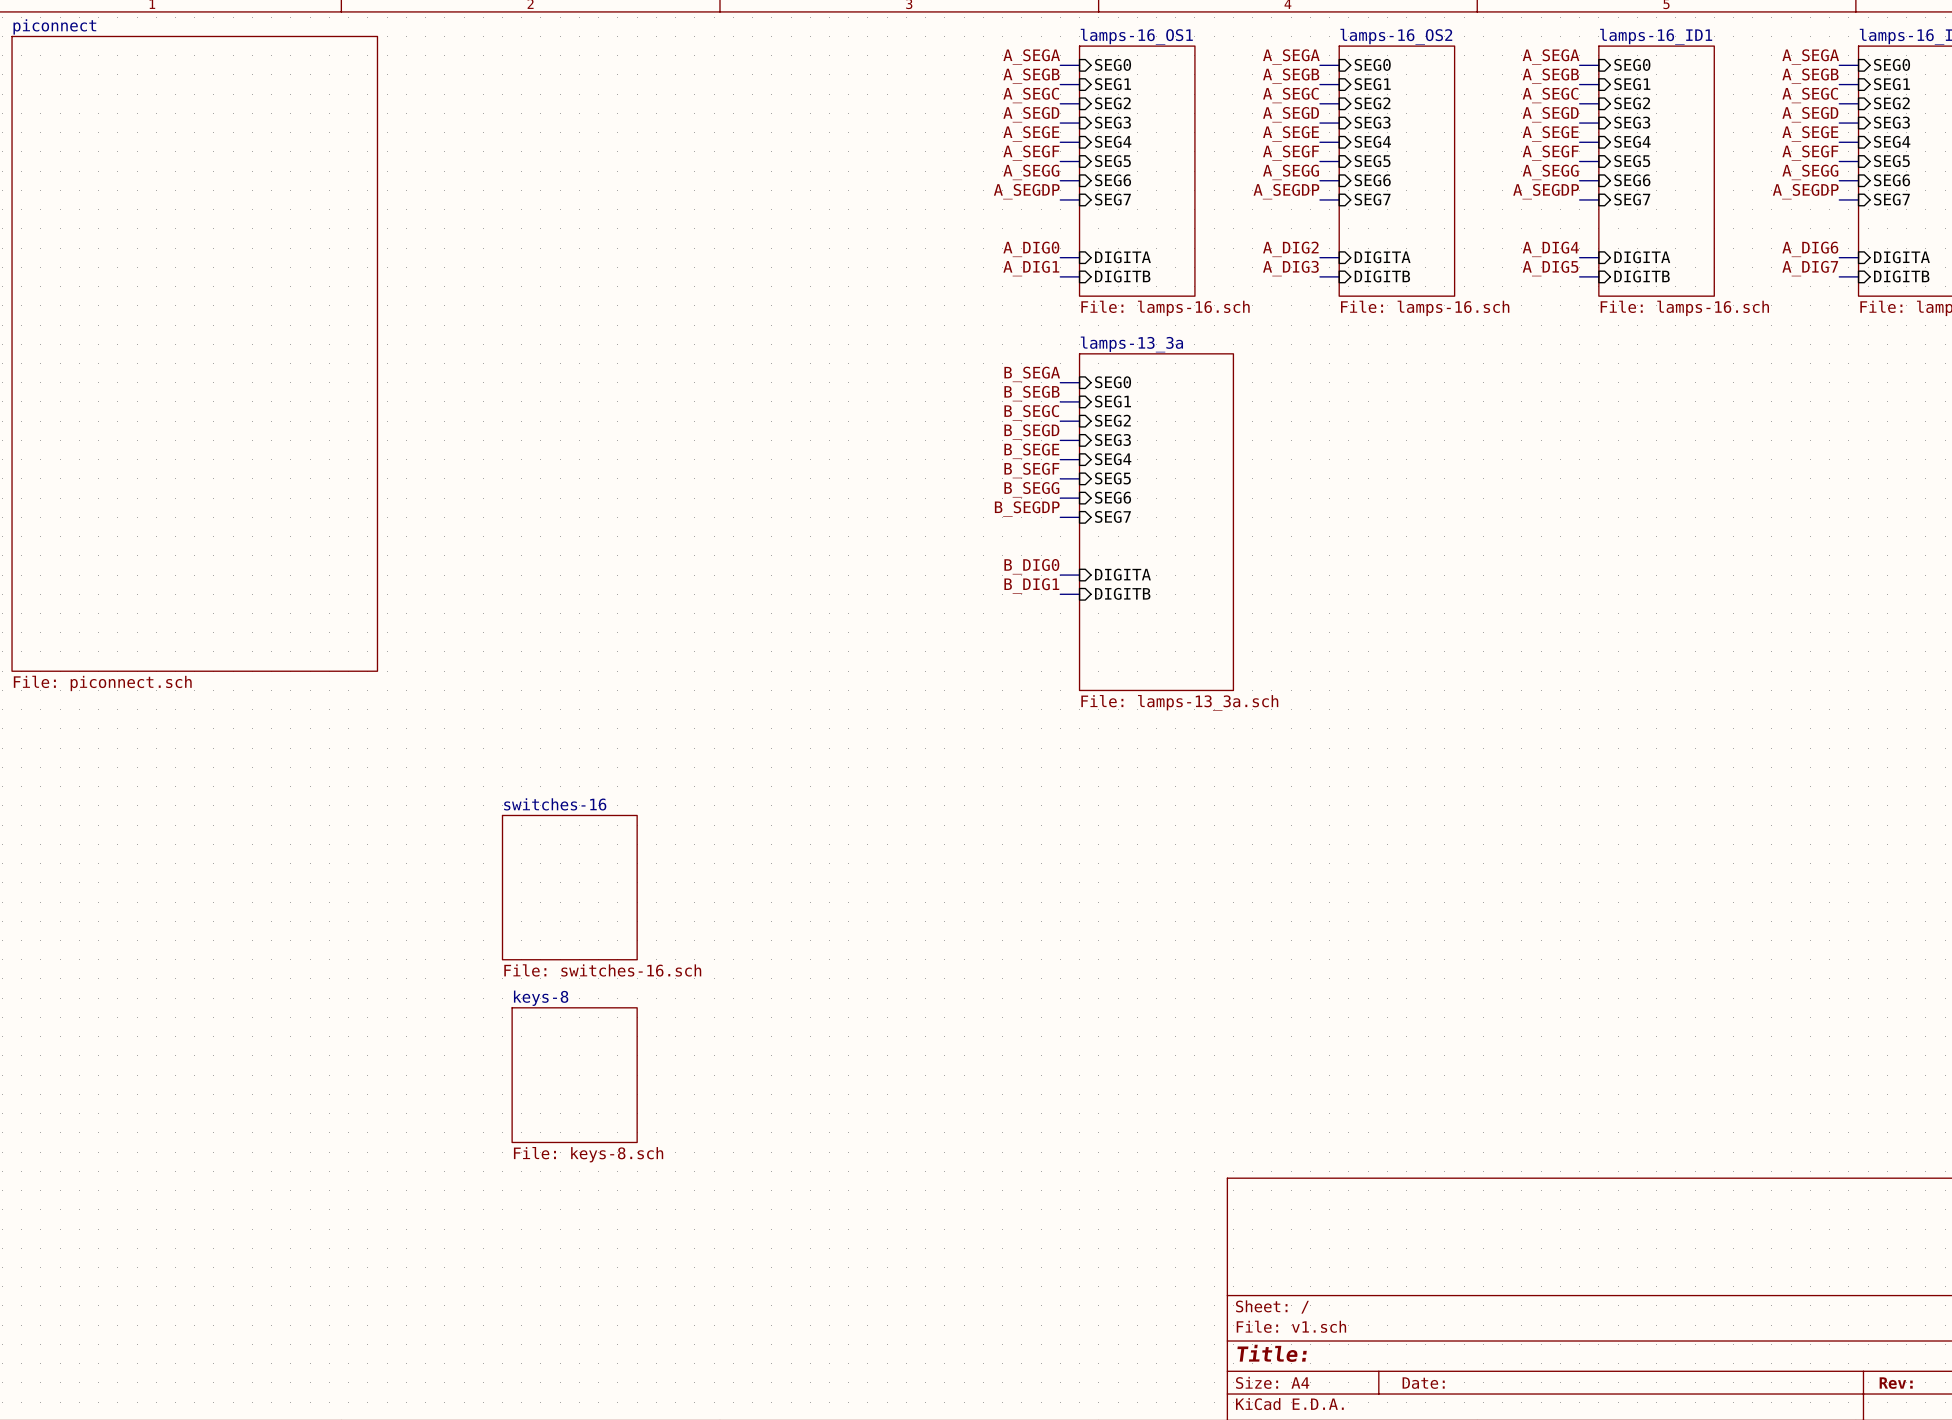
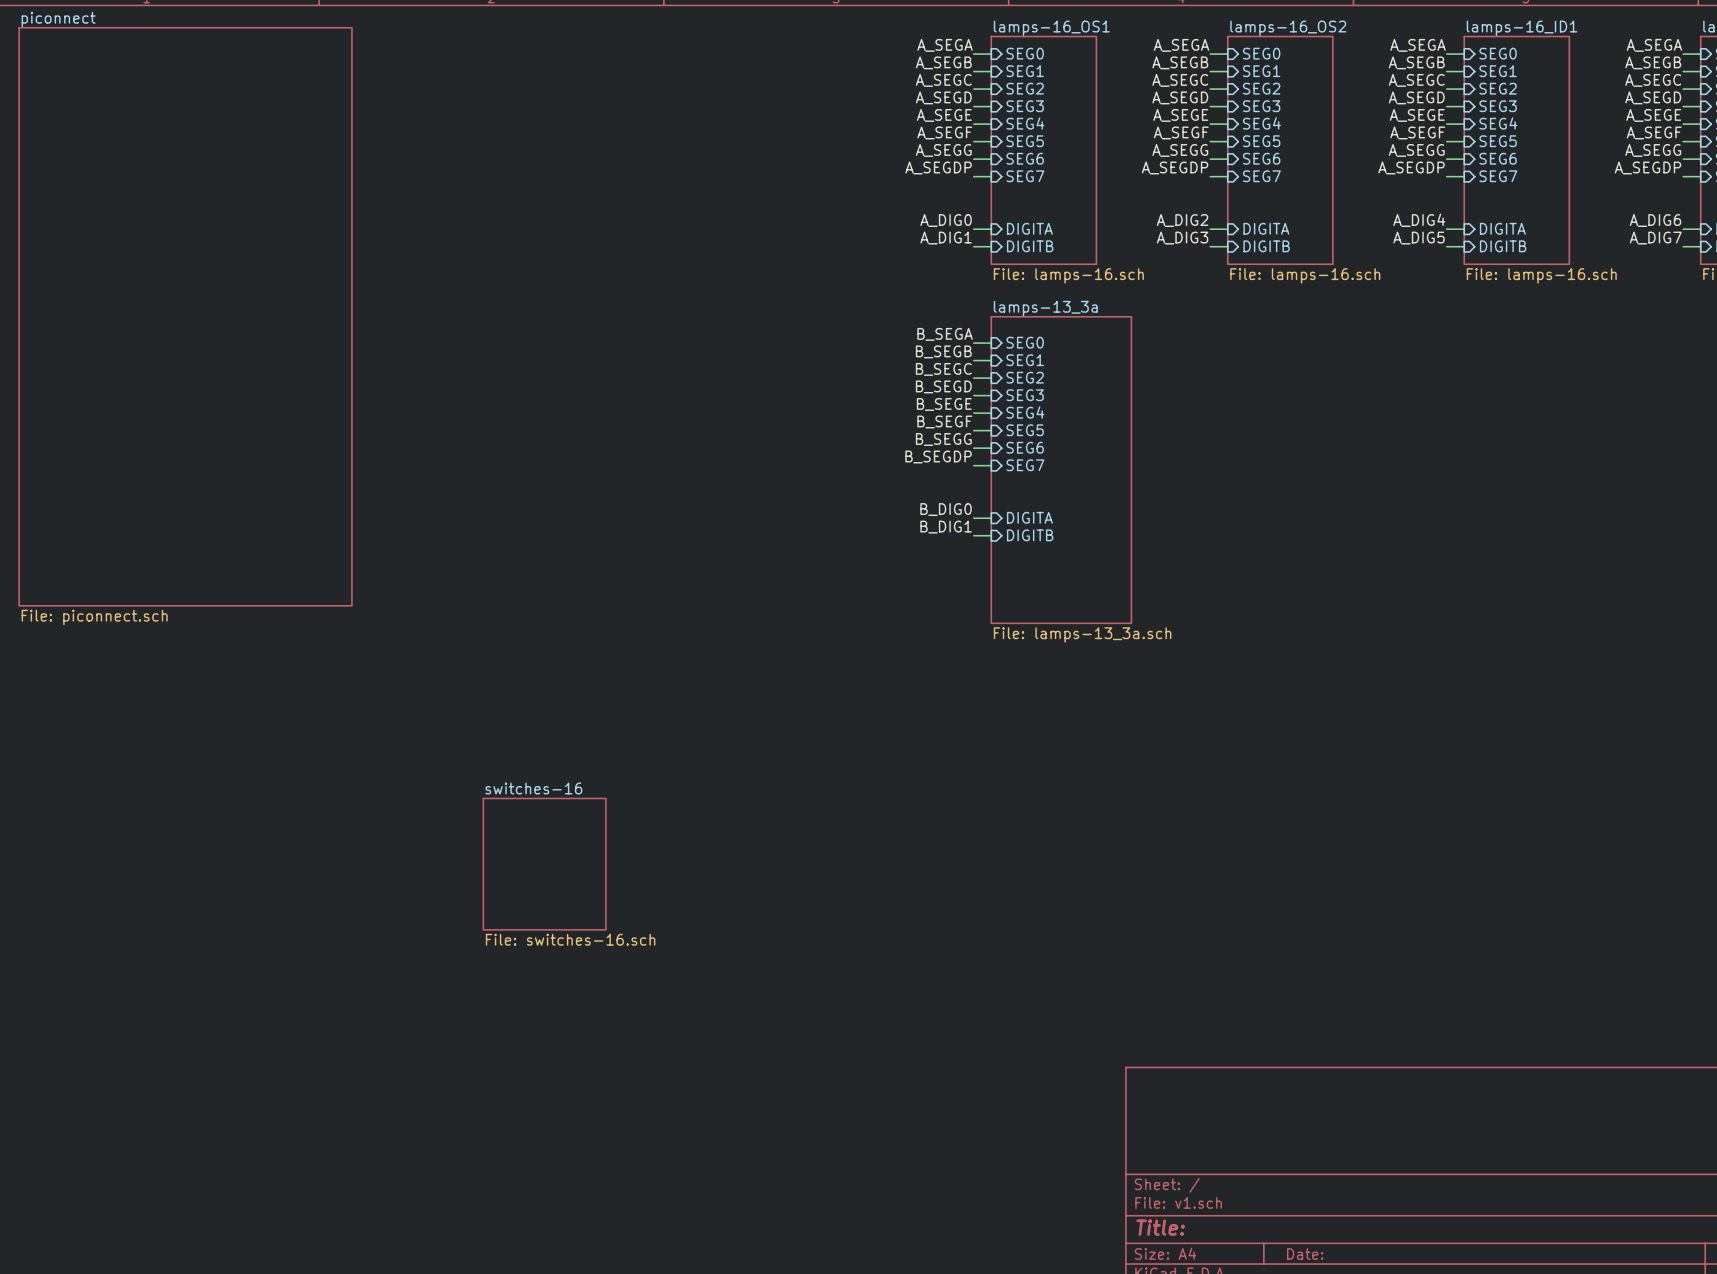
sheet switches-16 position: (569, 887) -> (544, 864)
sheet keys-8: File: keys-8.sch (574, 1075) -> none

